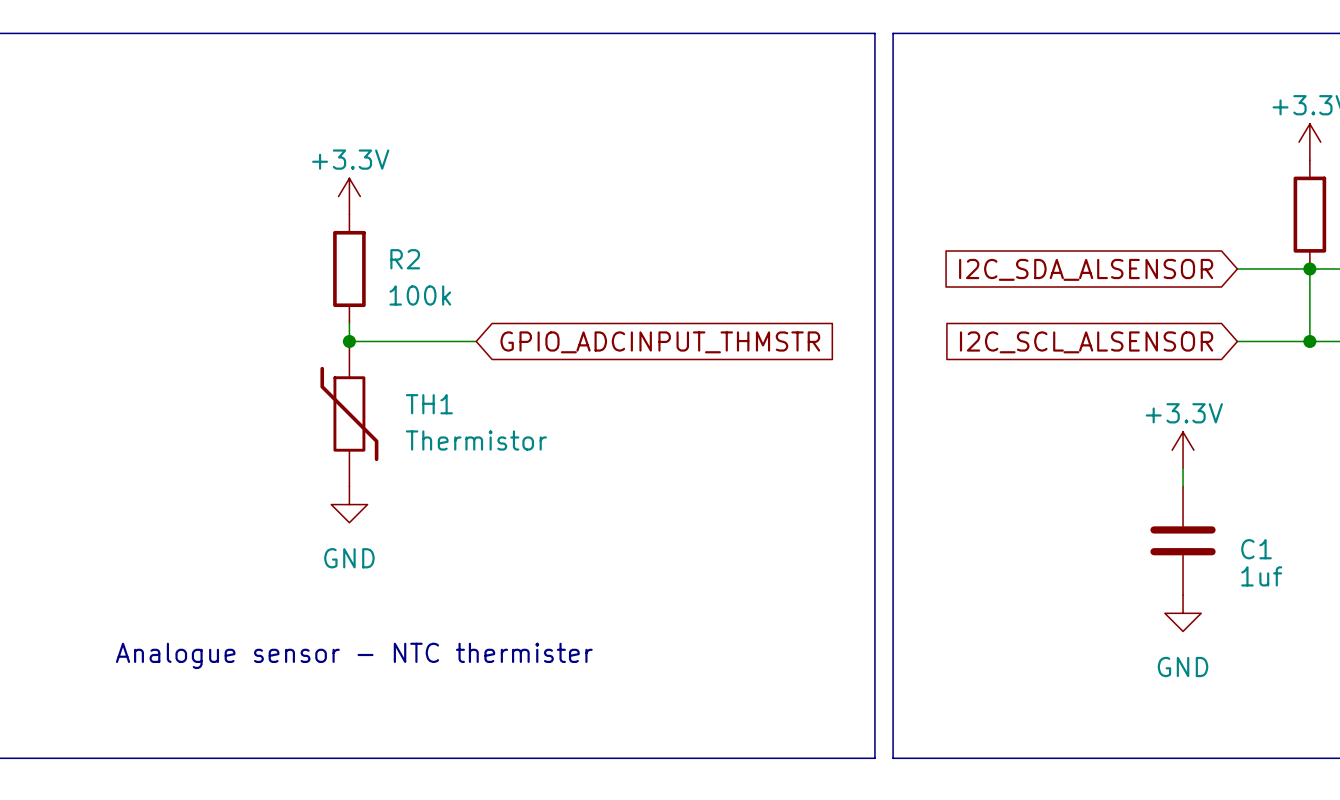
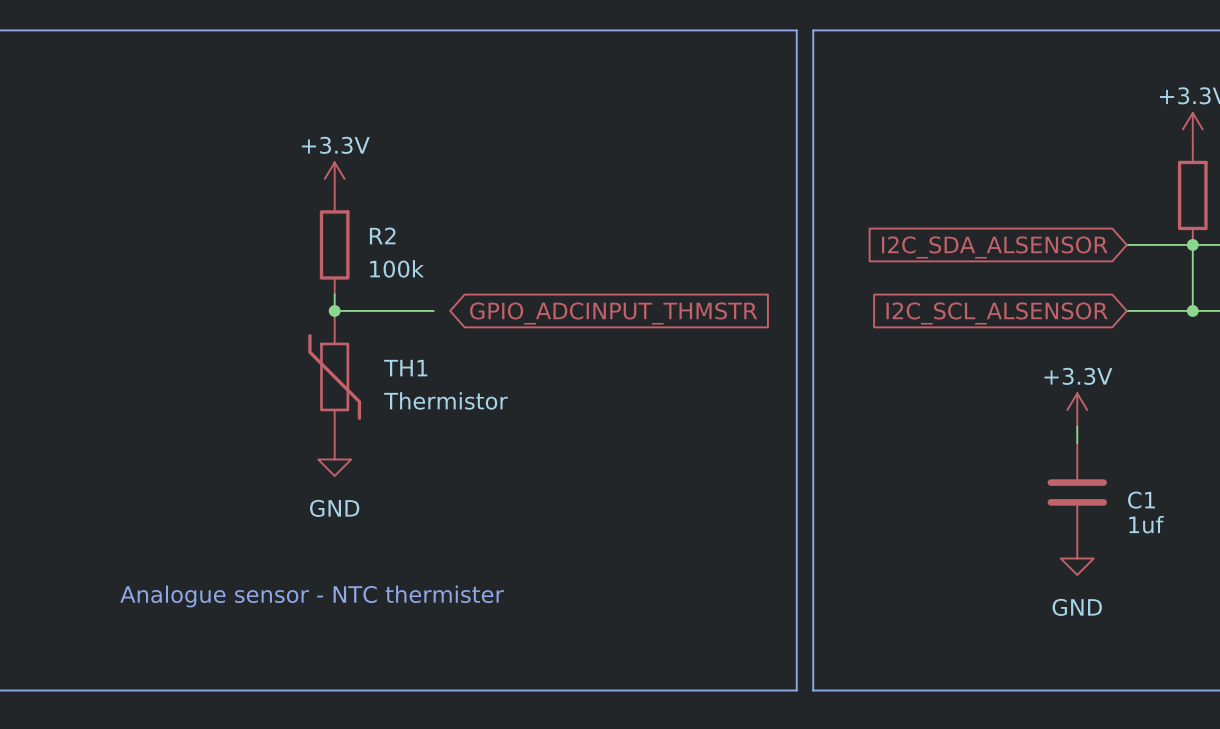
power symbol position: +3.3V (349, 196) -> +3.3V (334, 178)
R2 position: (349, 269) -> (334, 244)
wire: (349, 323) (349, 341) (367, 341) -> (334, 294) (334, 310)
junction position: (349, 341) -> (334, 310)
global label position: GPIO_ADCINPUT_THMSTR (660, 342) -> GPIO_ADCINPUT_THMSTR (613, 313)
TH1 position: (349, 413) -> (334, 376)
power symbol position: GND (349, 504) -> GND (334, 459)
text position: Analogue sensor - NTC thermister (354, 655) -> Analogue sensor - NTC thermister (312, 596)

